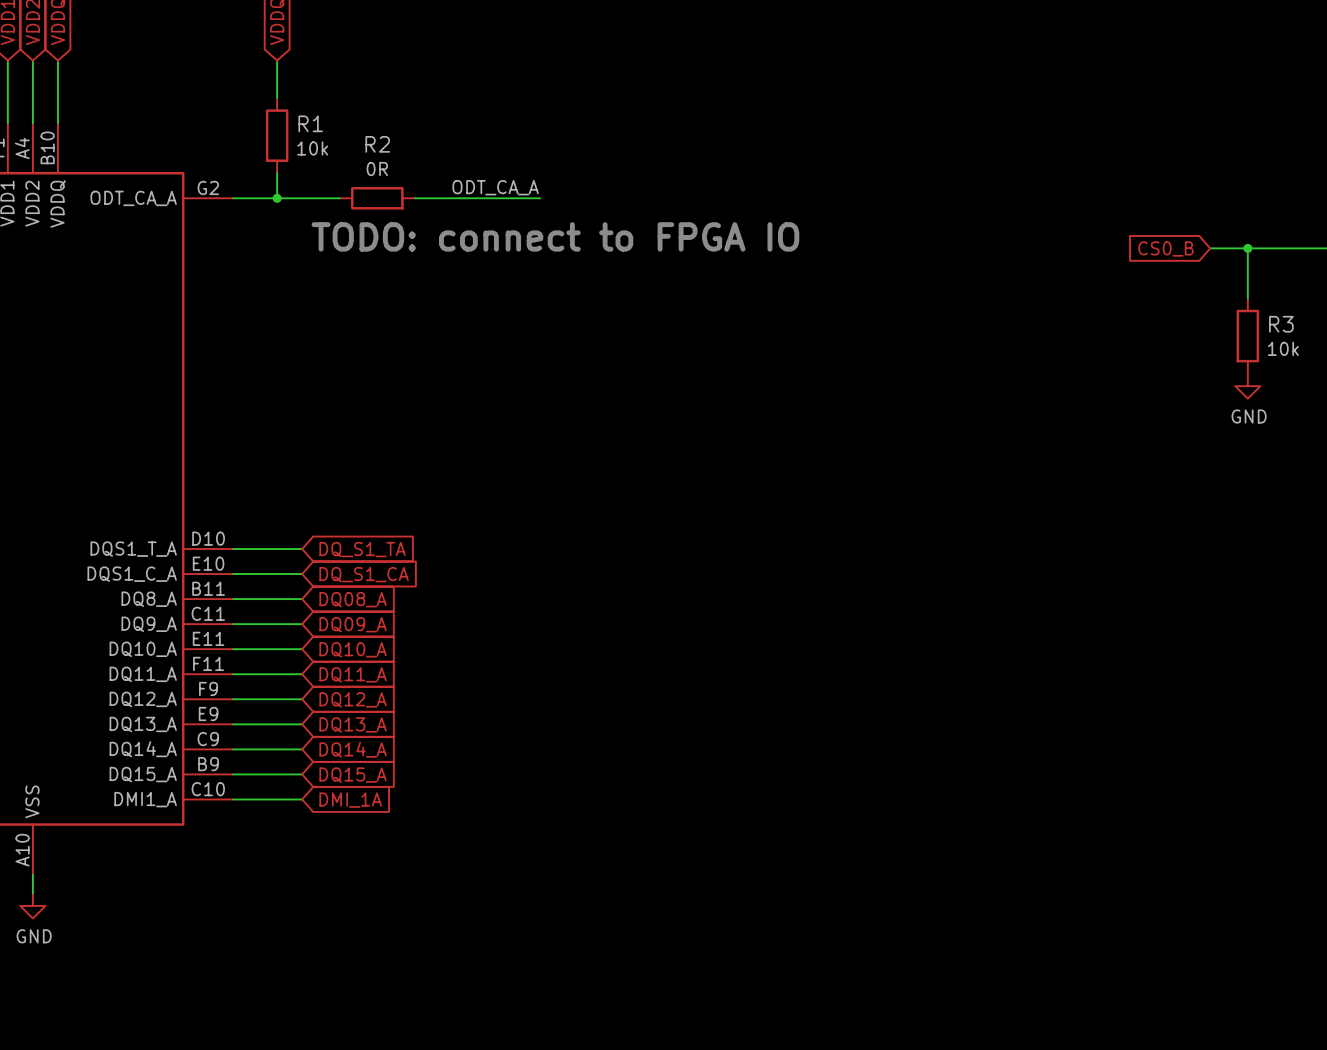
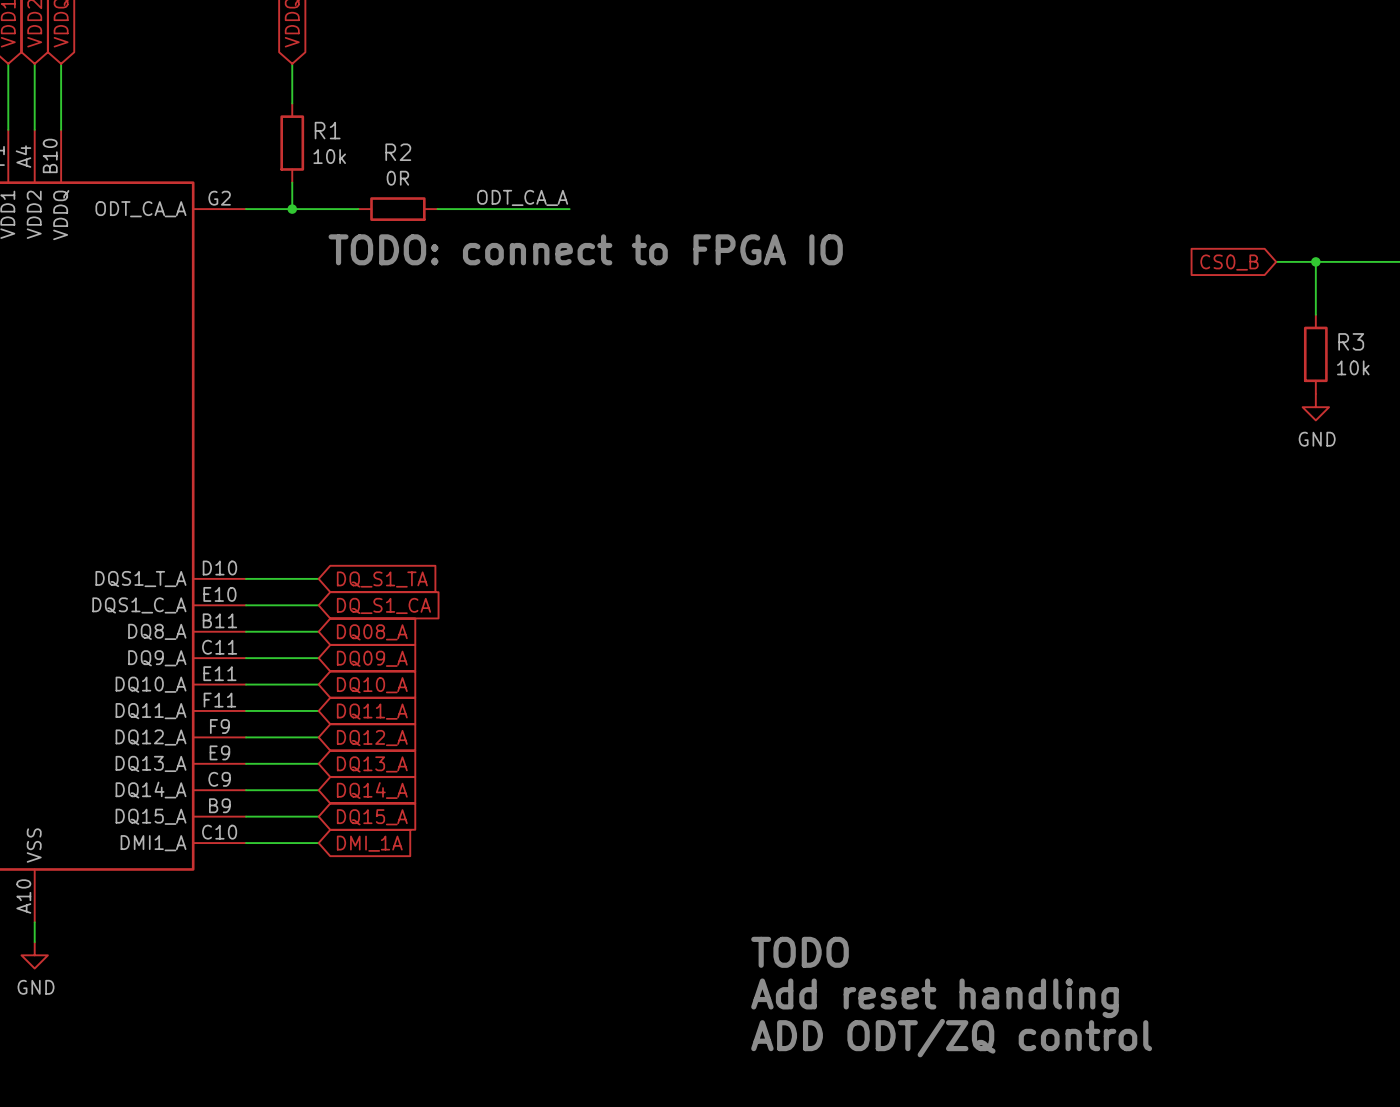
text: none -> TODO (800, 952)
text: none -> Add reset handling (934, 998)
text: none -> ADD ODT/ZQ control (951, 1038)

